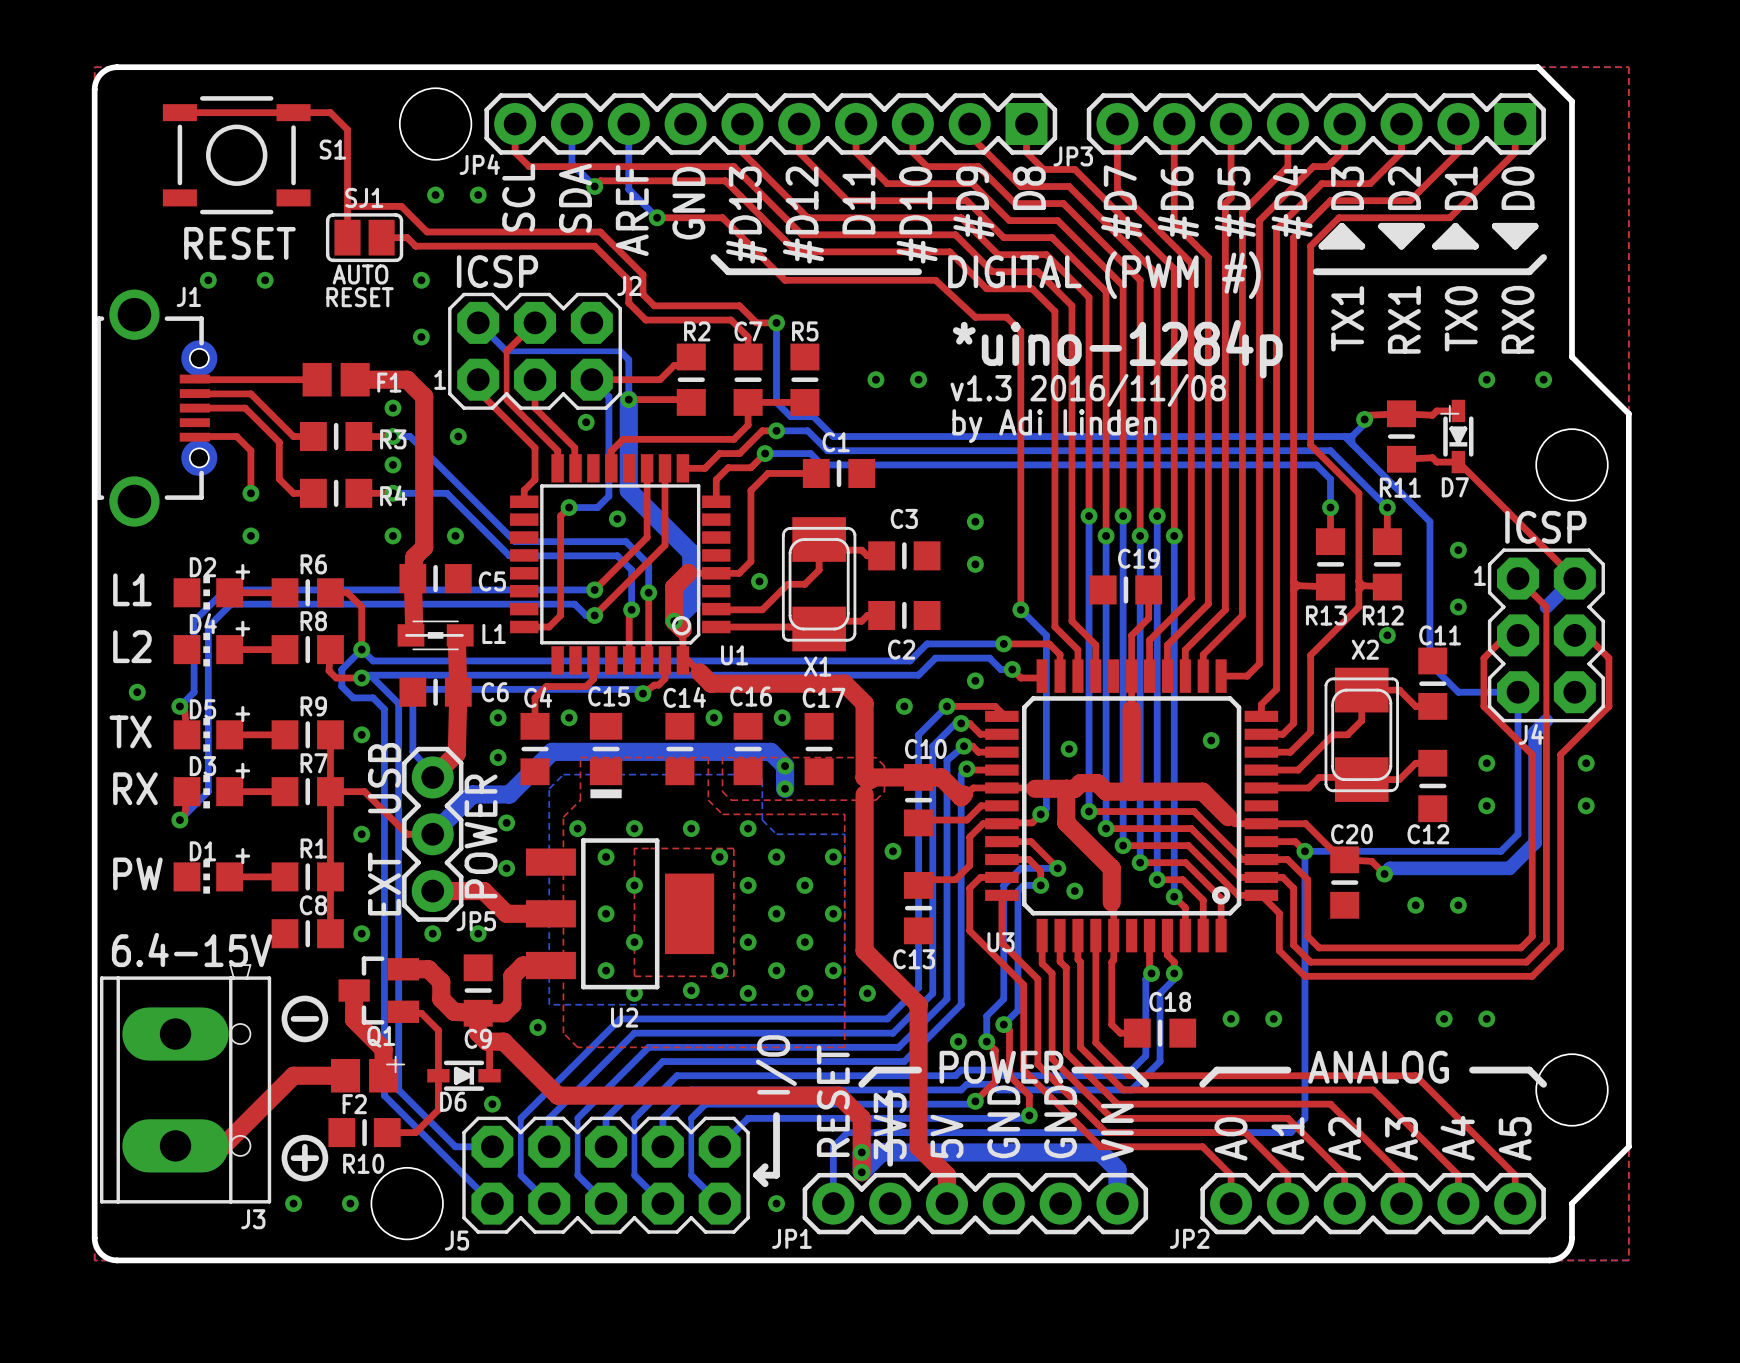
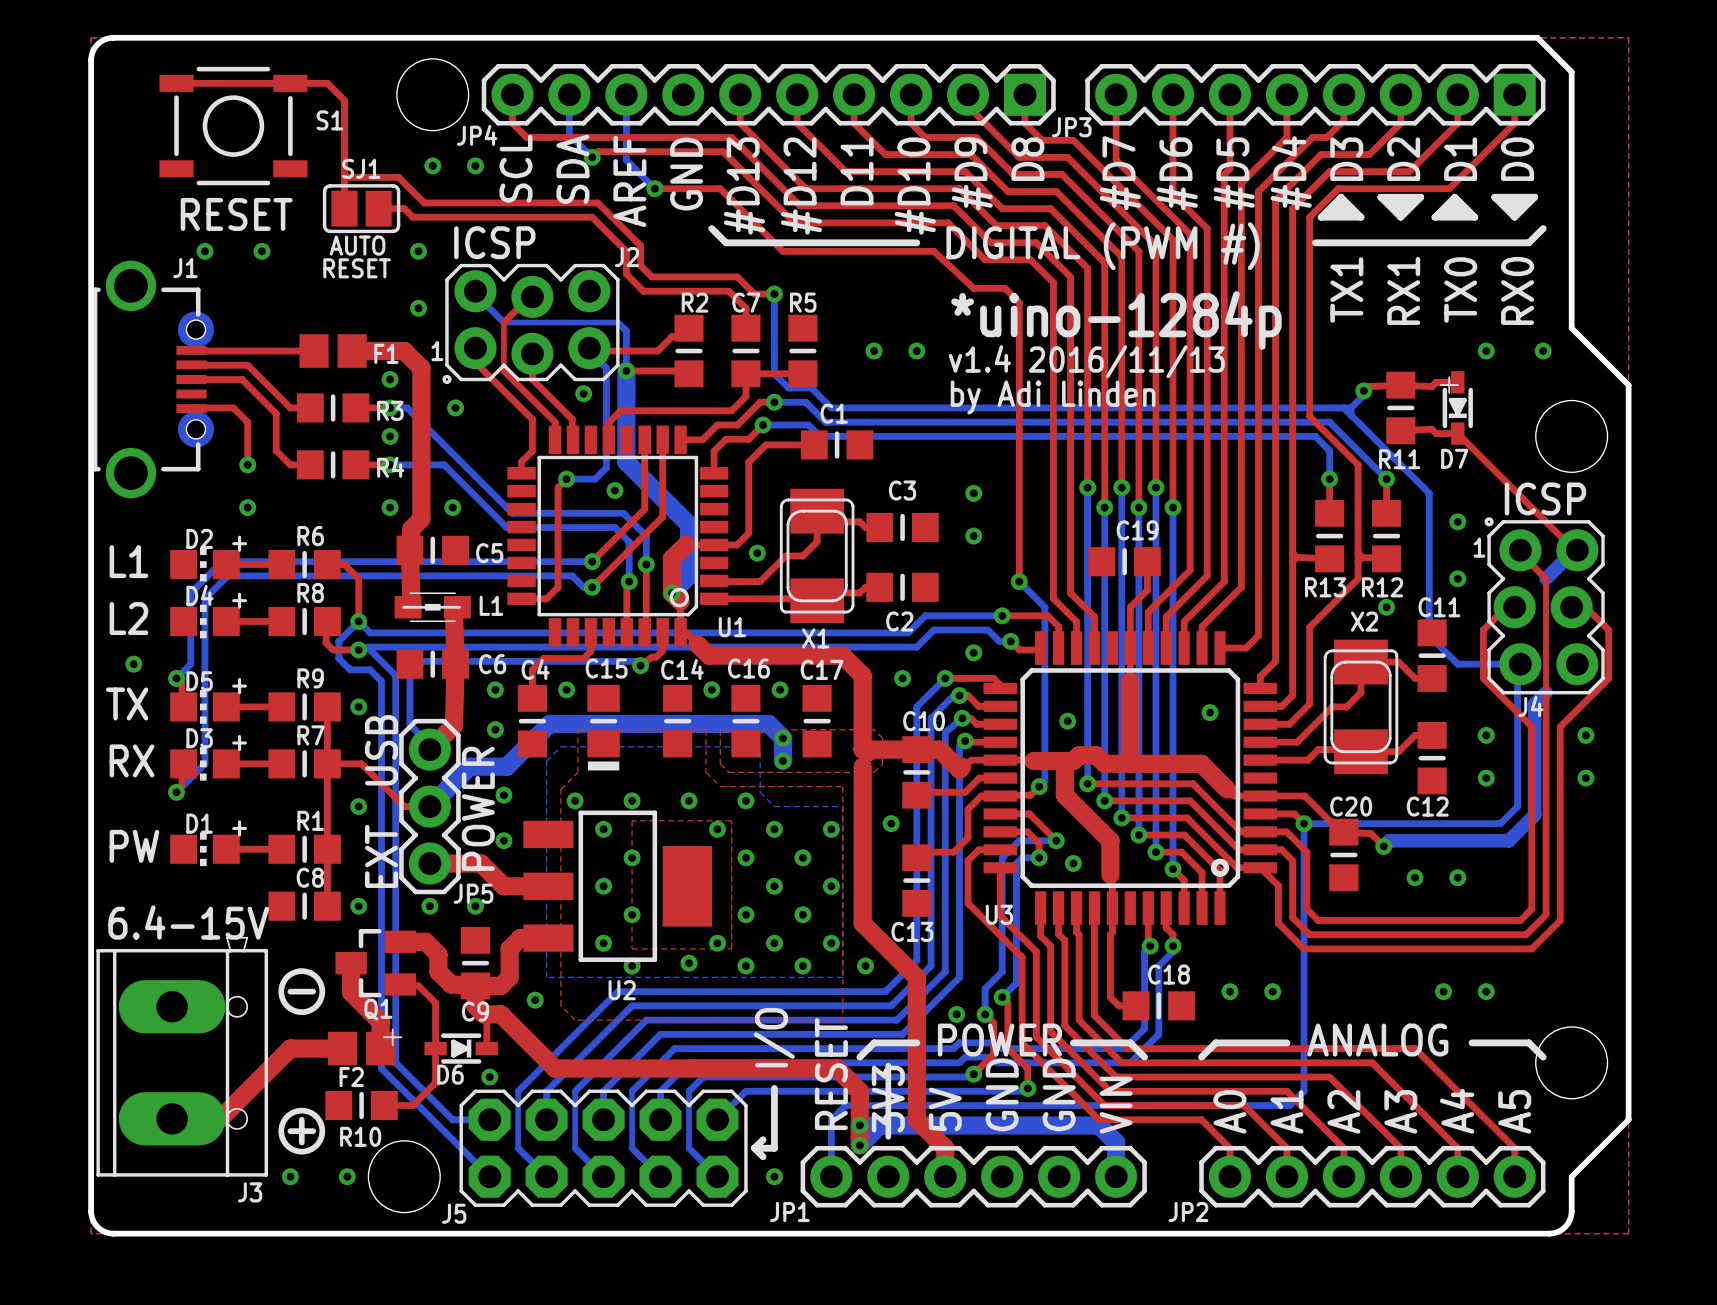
J2 footprint: [448, 292, 622, 410] -> [442, 263, 620, 385]
text: v1.3 2016/11/08 (1088, 390) -> v1.4 2016/11/13 (1086, 361)
J4 footprint: [1487, 548, 1605, 723] -> [1484, 517, 1605, 695]

